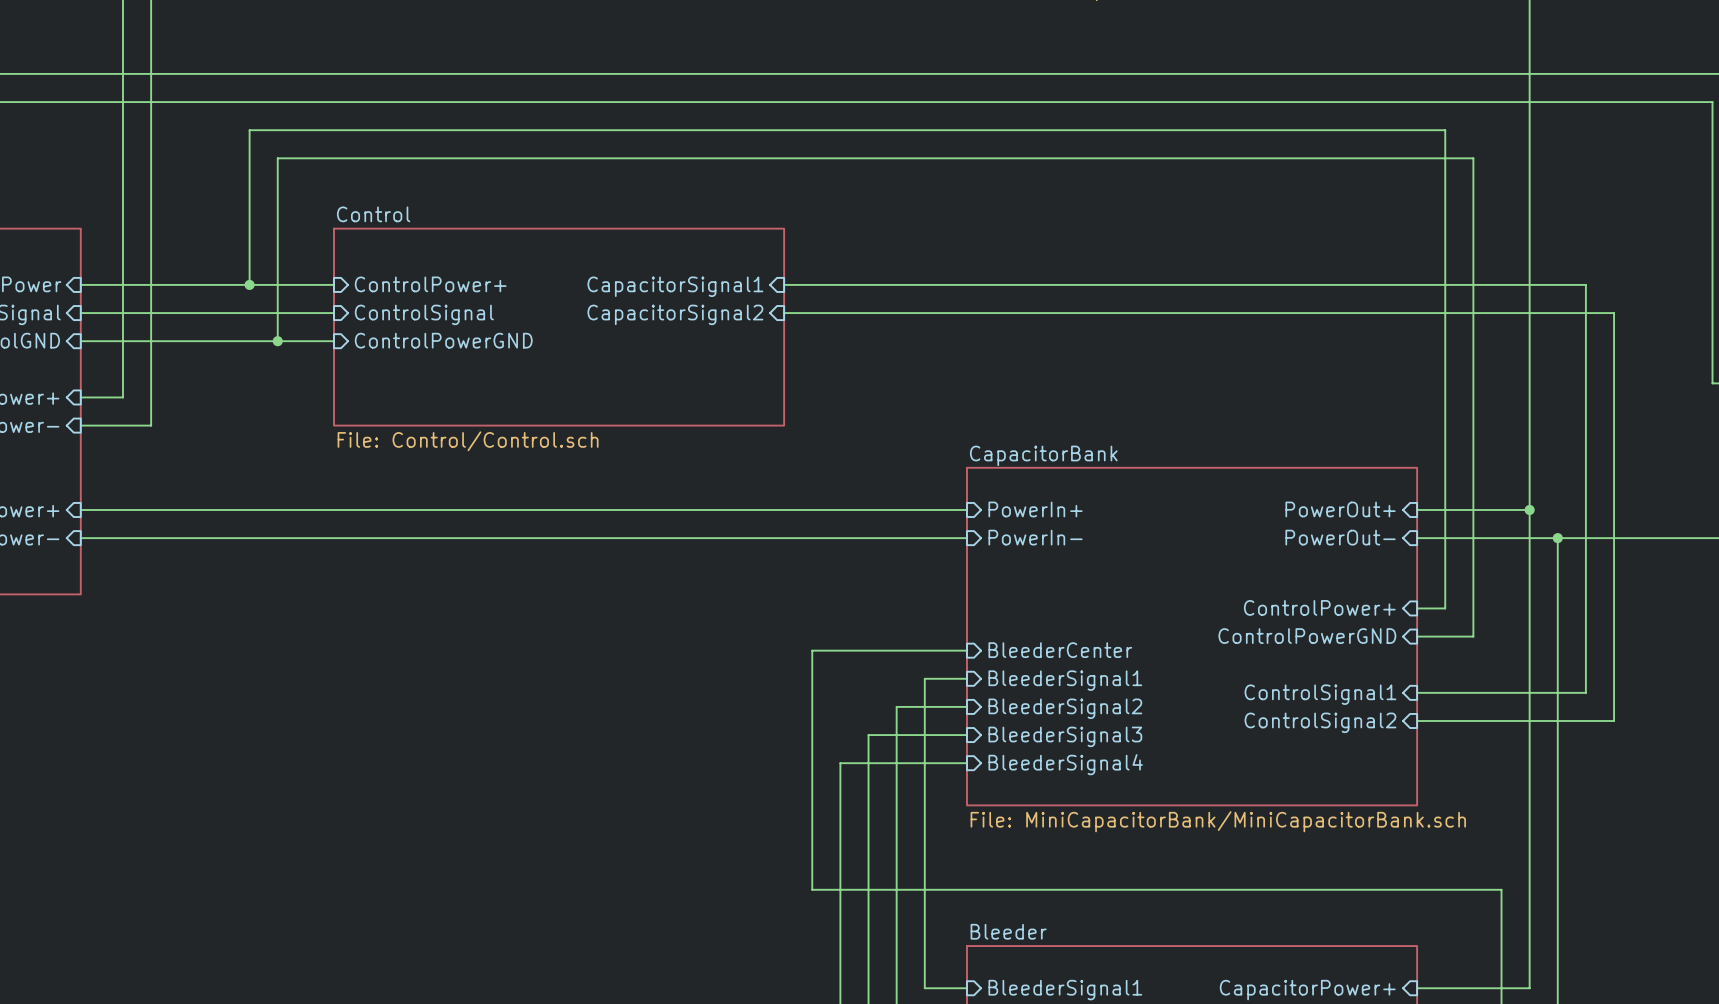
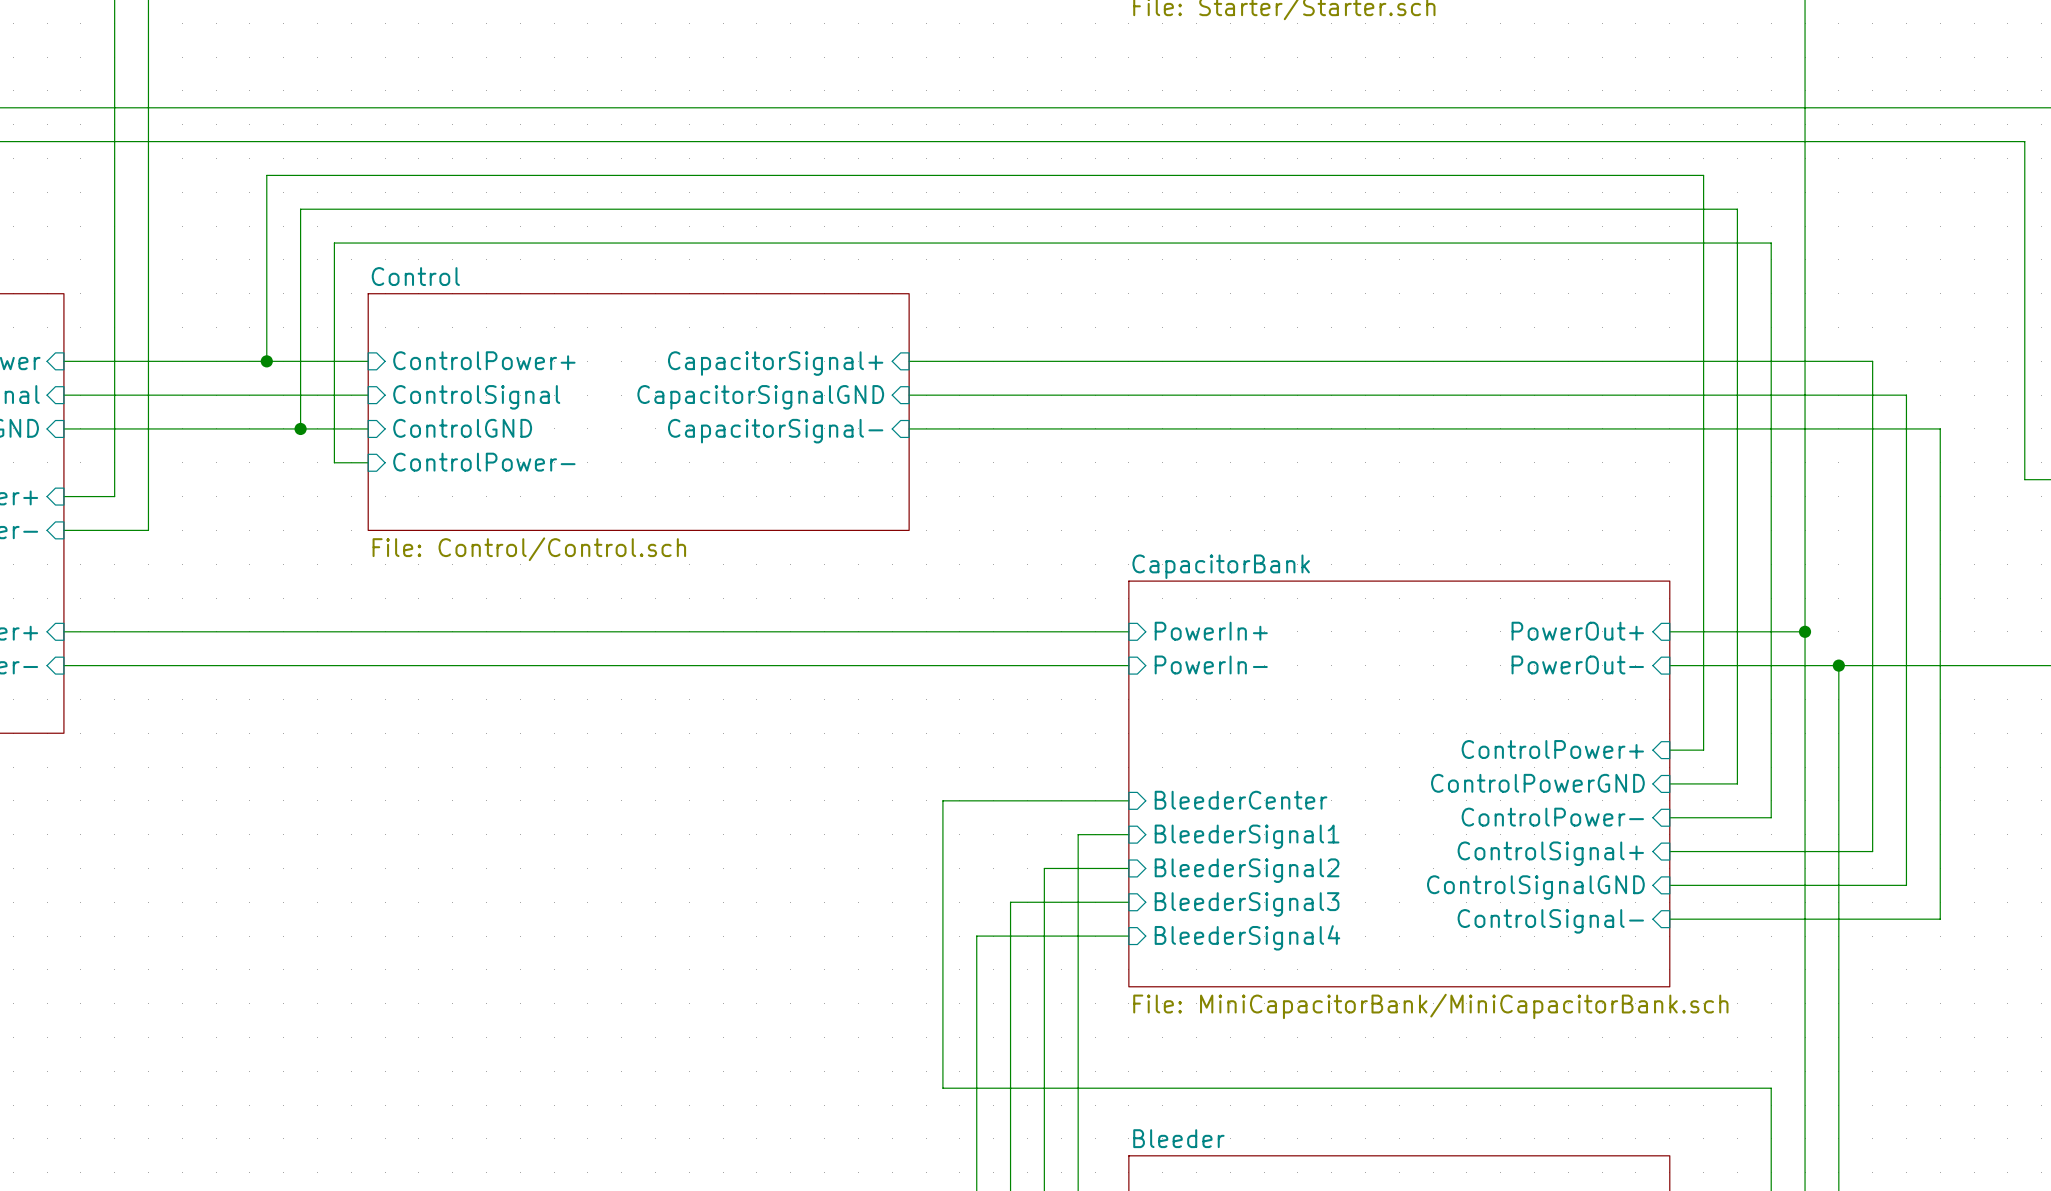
sheet pin: CapacitorSignal1 (675, 286) -> CapacitorSignal+ (775, 363)
sheet pin: CapacitorSignal2 (675, 314) -> CapacitorSignalGND (760, 397)
sheet pin: ControlPowerGND (443, 340) -> ControlGND (462, 428)
wire: none -> (909, 428) (1940, 428) (1940, 919) (1669, 919)
sheet pin: none -> CapacitorSignal- (775, 431)
sheet pin: none -> ControlPower- (484, 462)
wire: none -> (368, 462) (334, 462) (334, 243) (1771, 243) (1771, 817) (1669, 817)
sheet pin: none -> ControlPower- (1552, 817)
sheet pin: ControlSignal1 (1320, 694) -> ControlSignal+ (1550, 853)
sheet pin: ControlSignal2 (1320, 722) -> ControlSignalGND (1535, 887)
sheet pin: none -> ControlSignal- (1550, 921)

